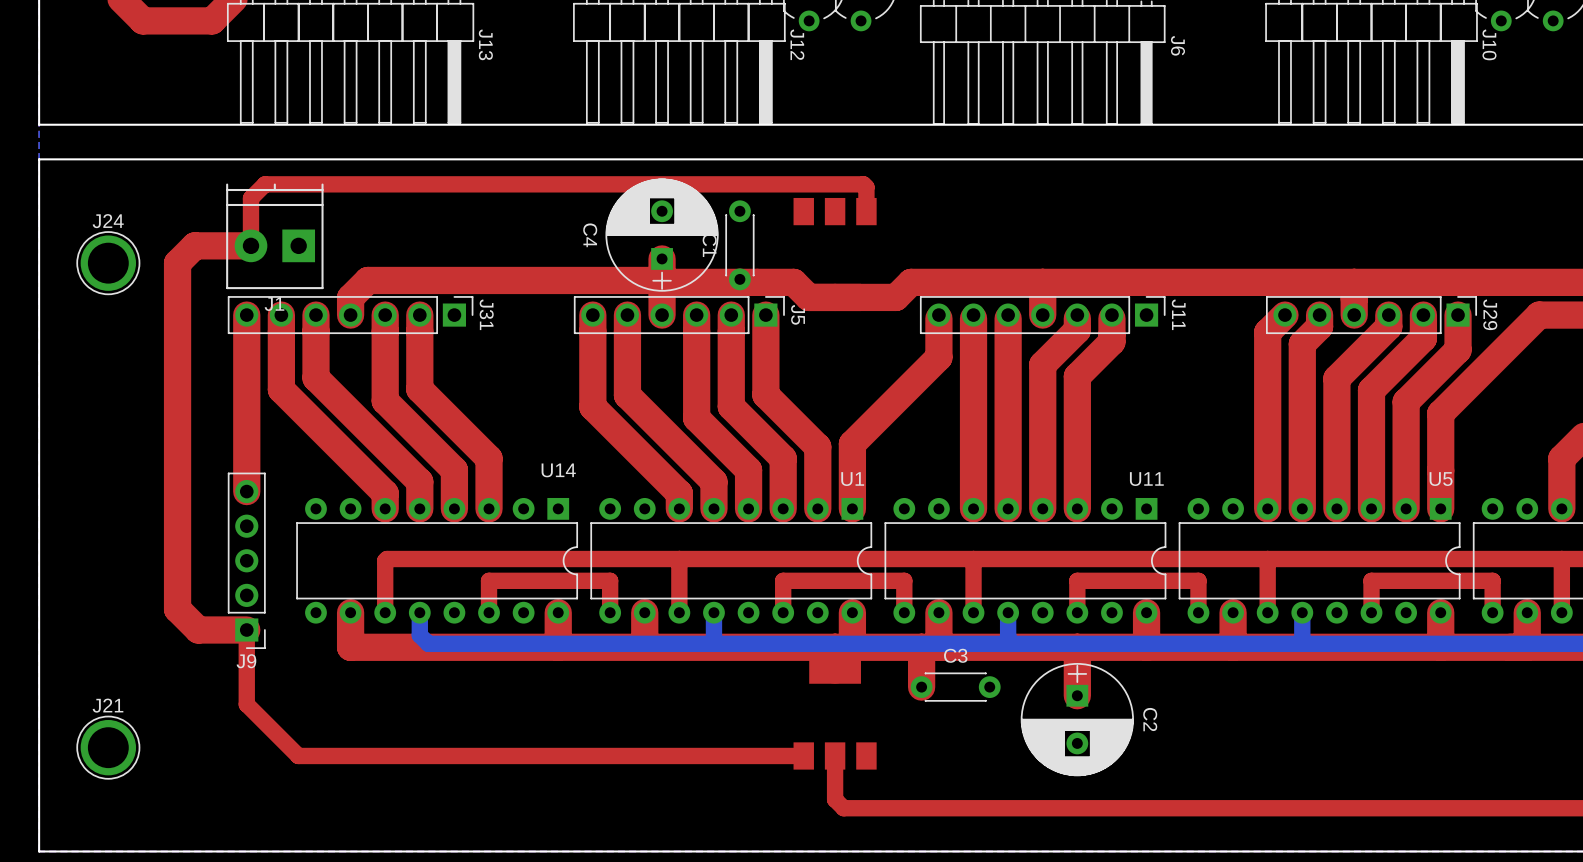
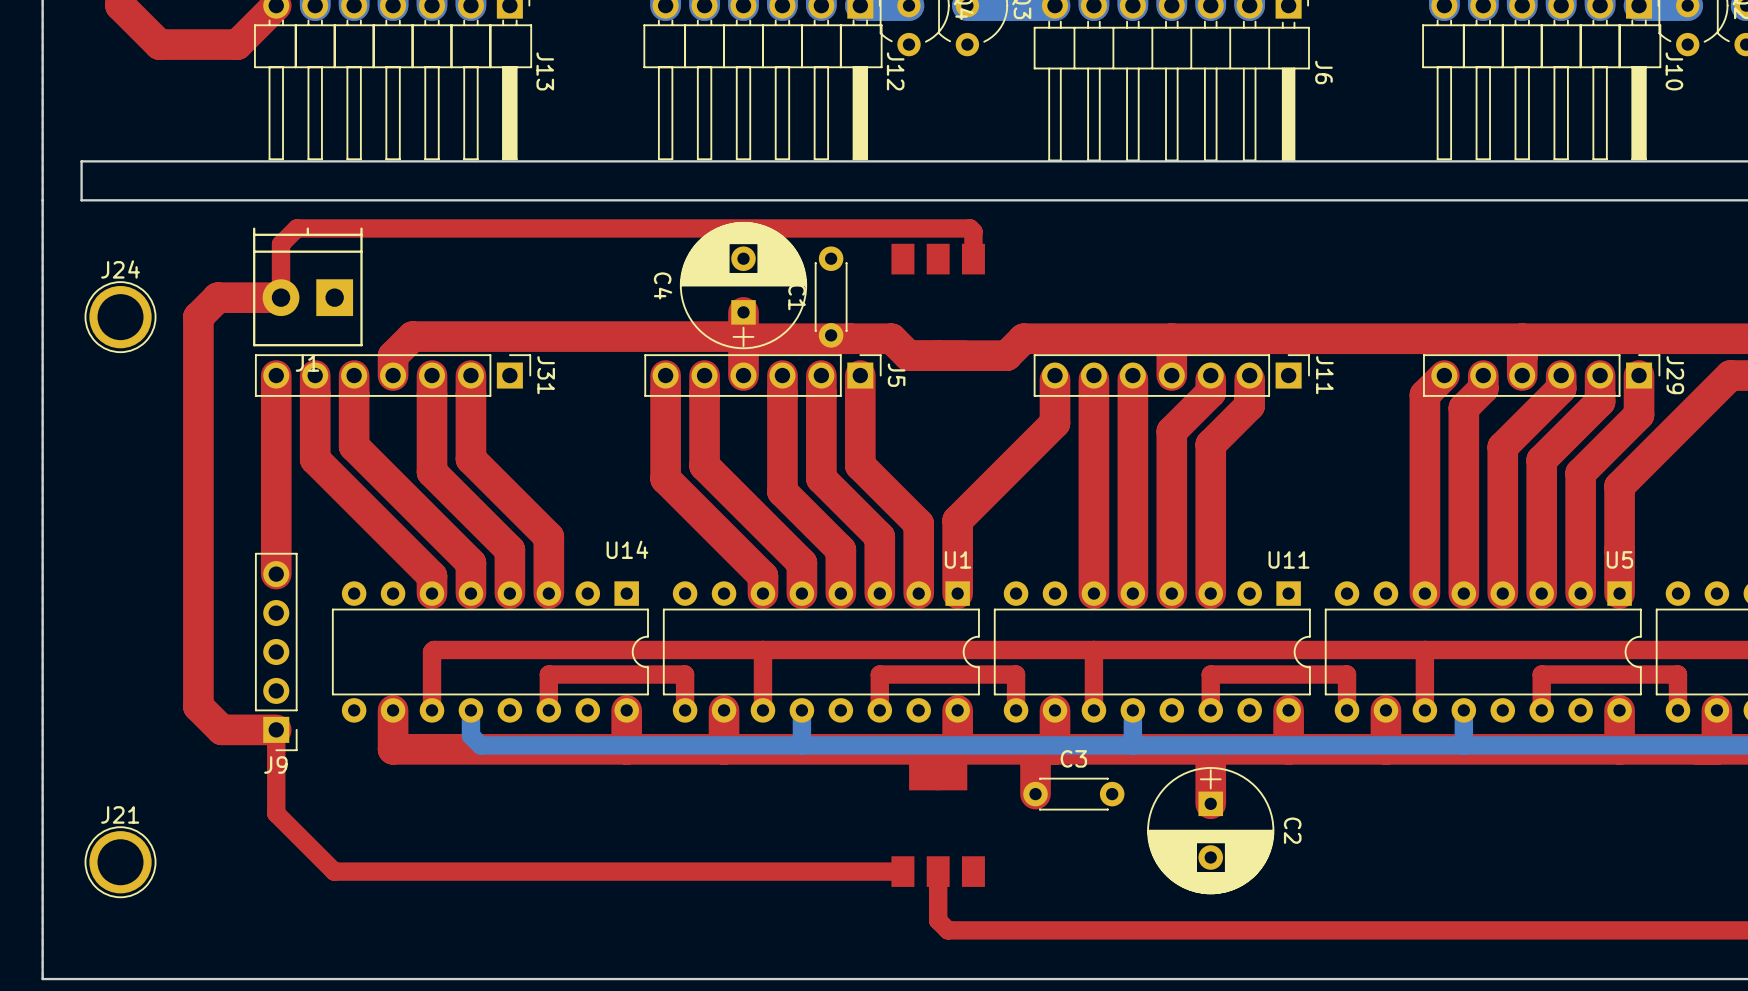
board edge: (73, 124) (39, 124) -> (81, 161) (81, 200)
board edge: (73, 159) (39, 159) -> (42, 161) (42, 200)

